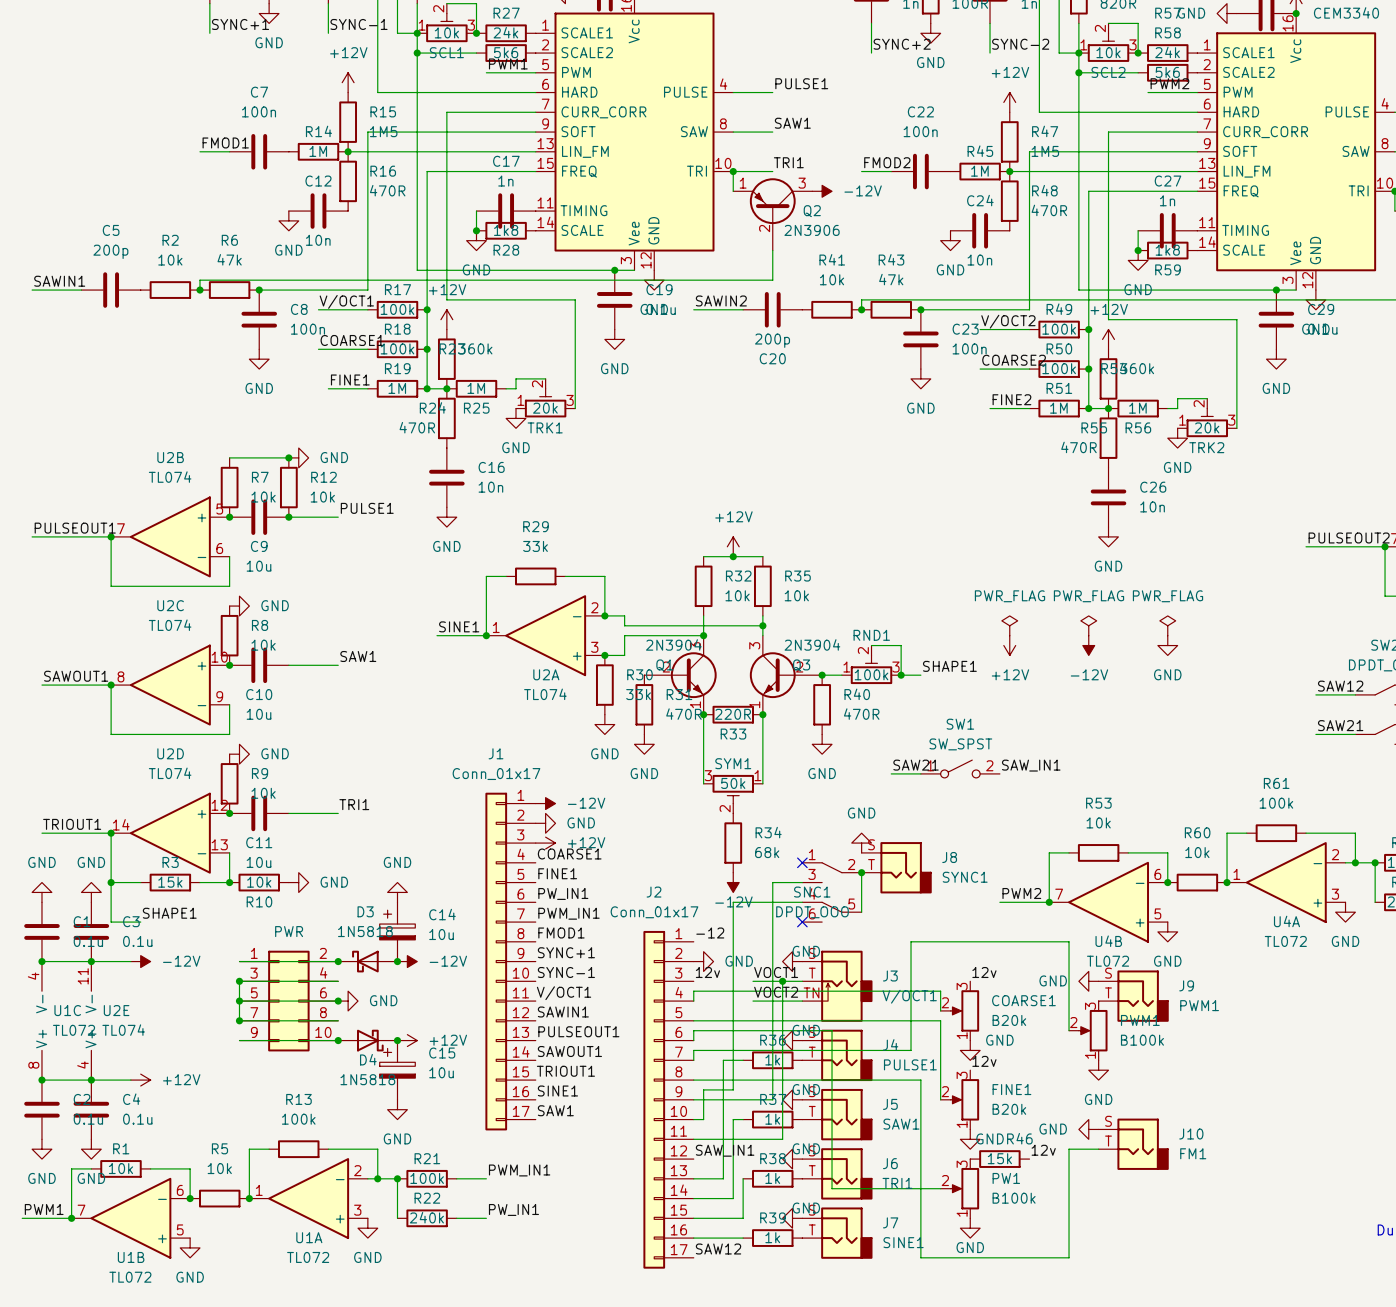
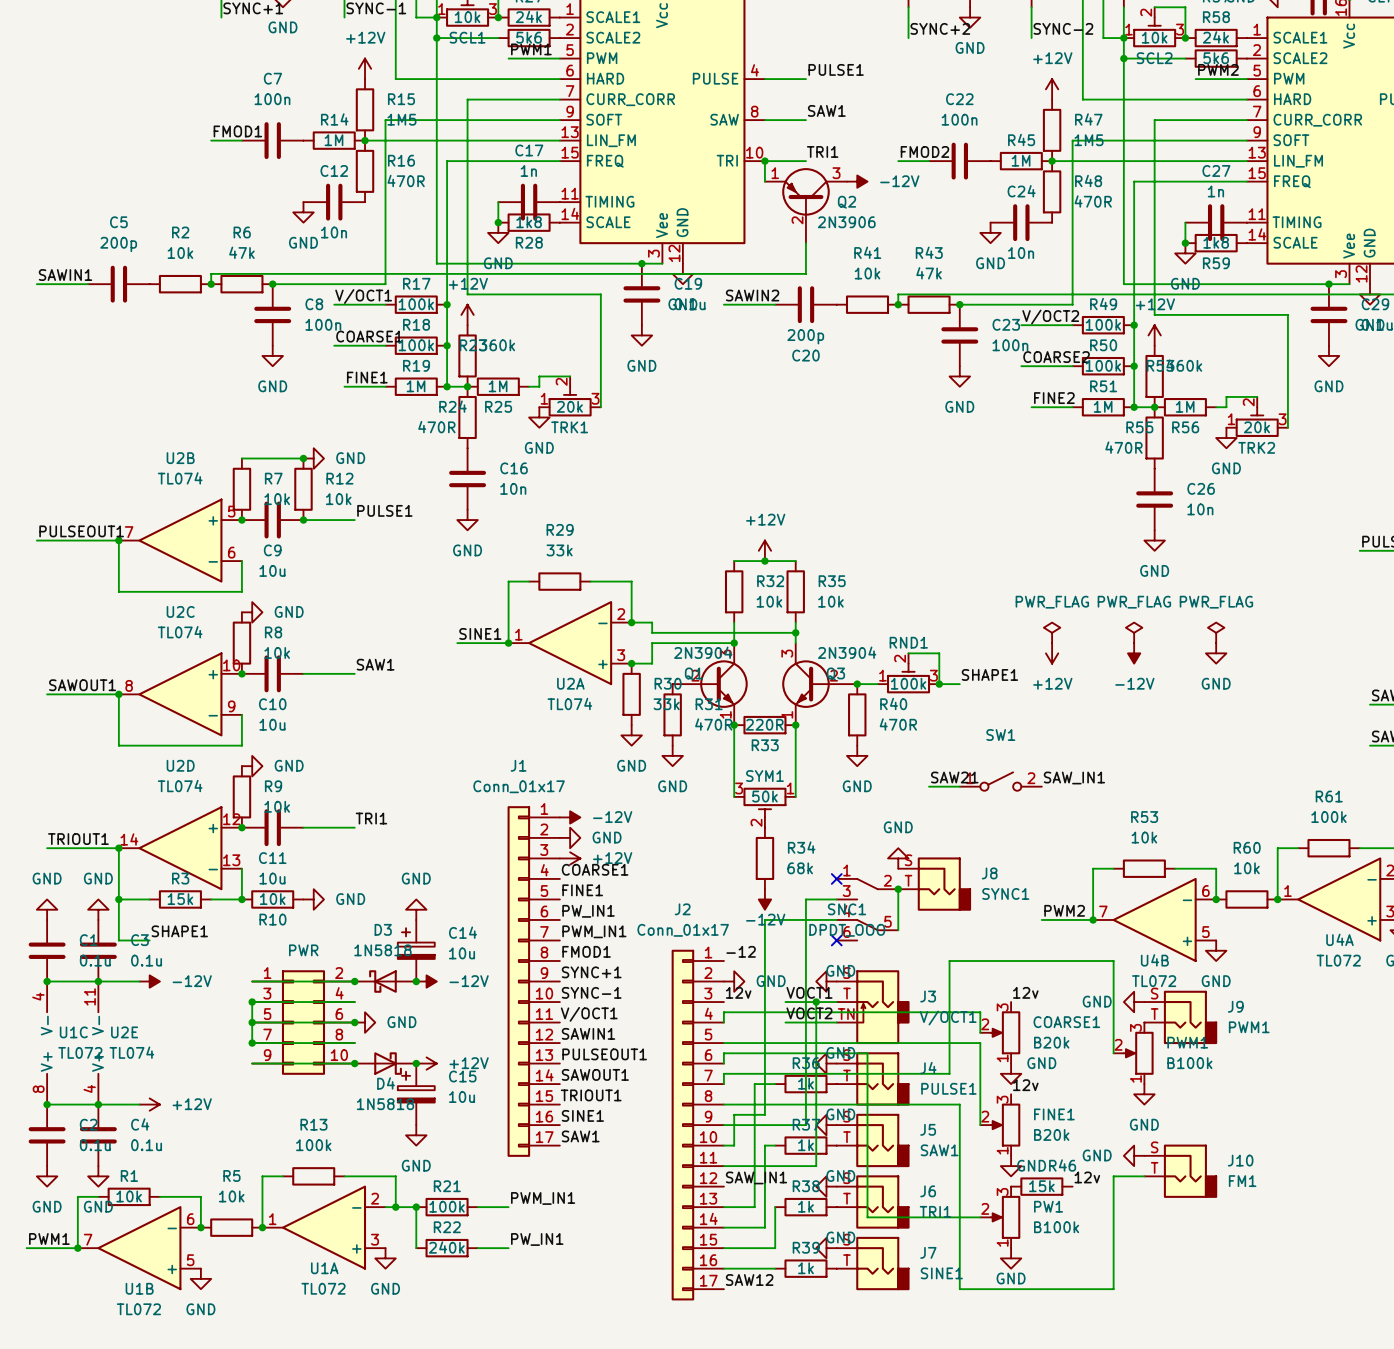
SW1 value: SW_SPST (960, 744) -> none

